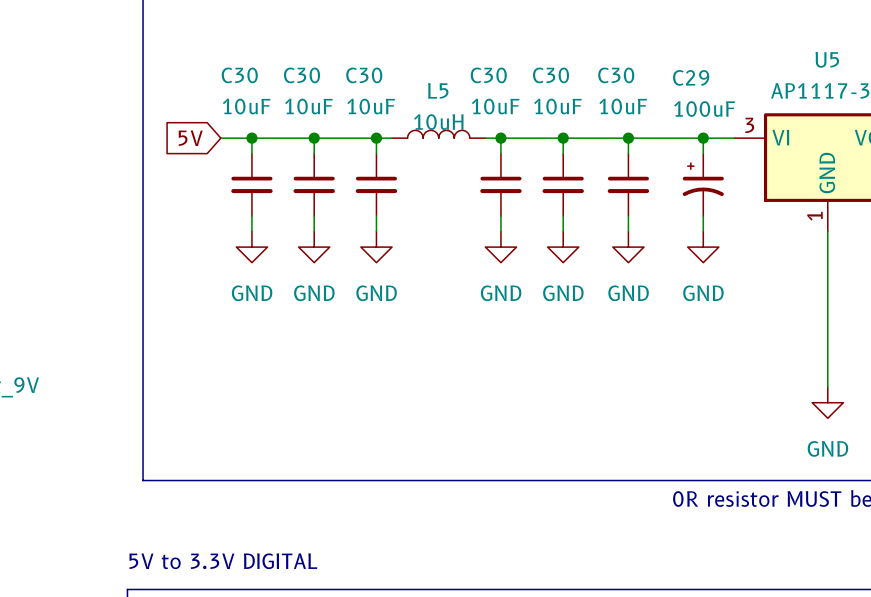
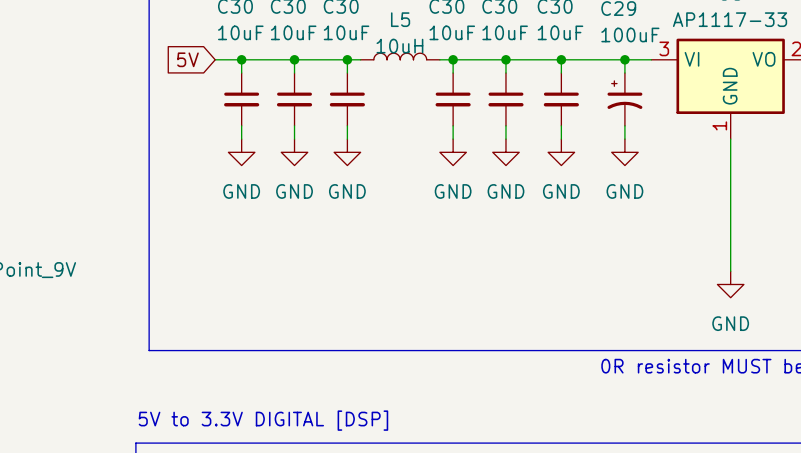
text: 5V to 3.3V DIGITAL (223, 561) -> 5V to 3.3V DIGITAL [DSP] (263, 420)

